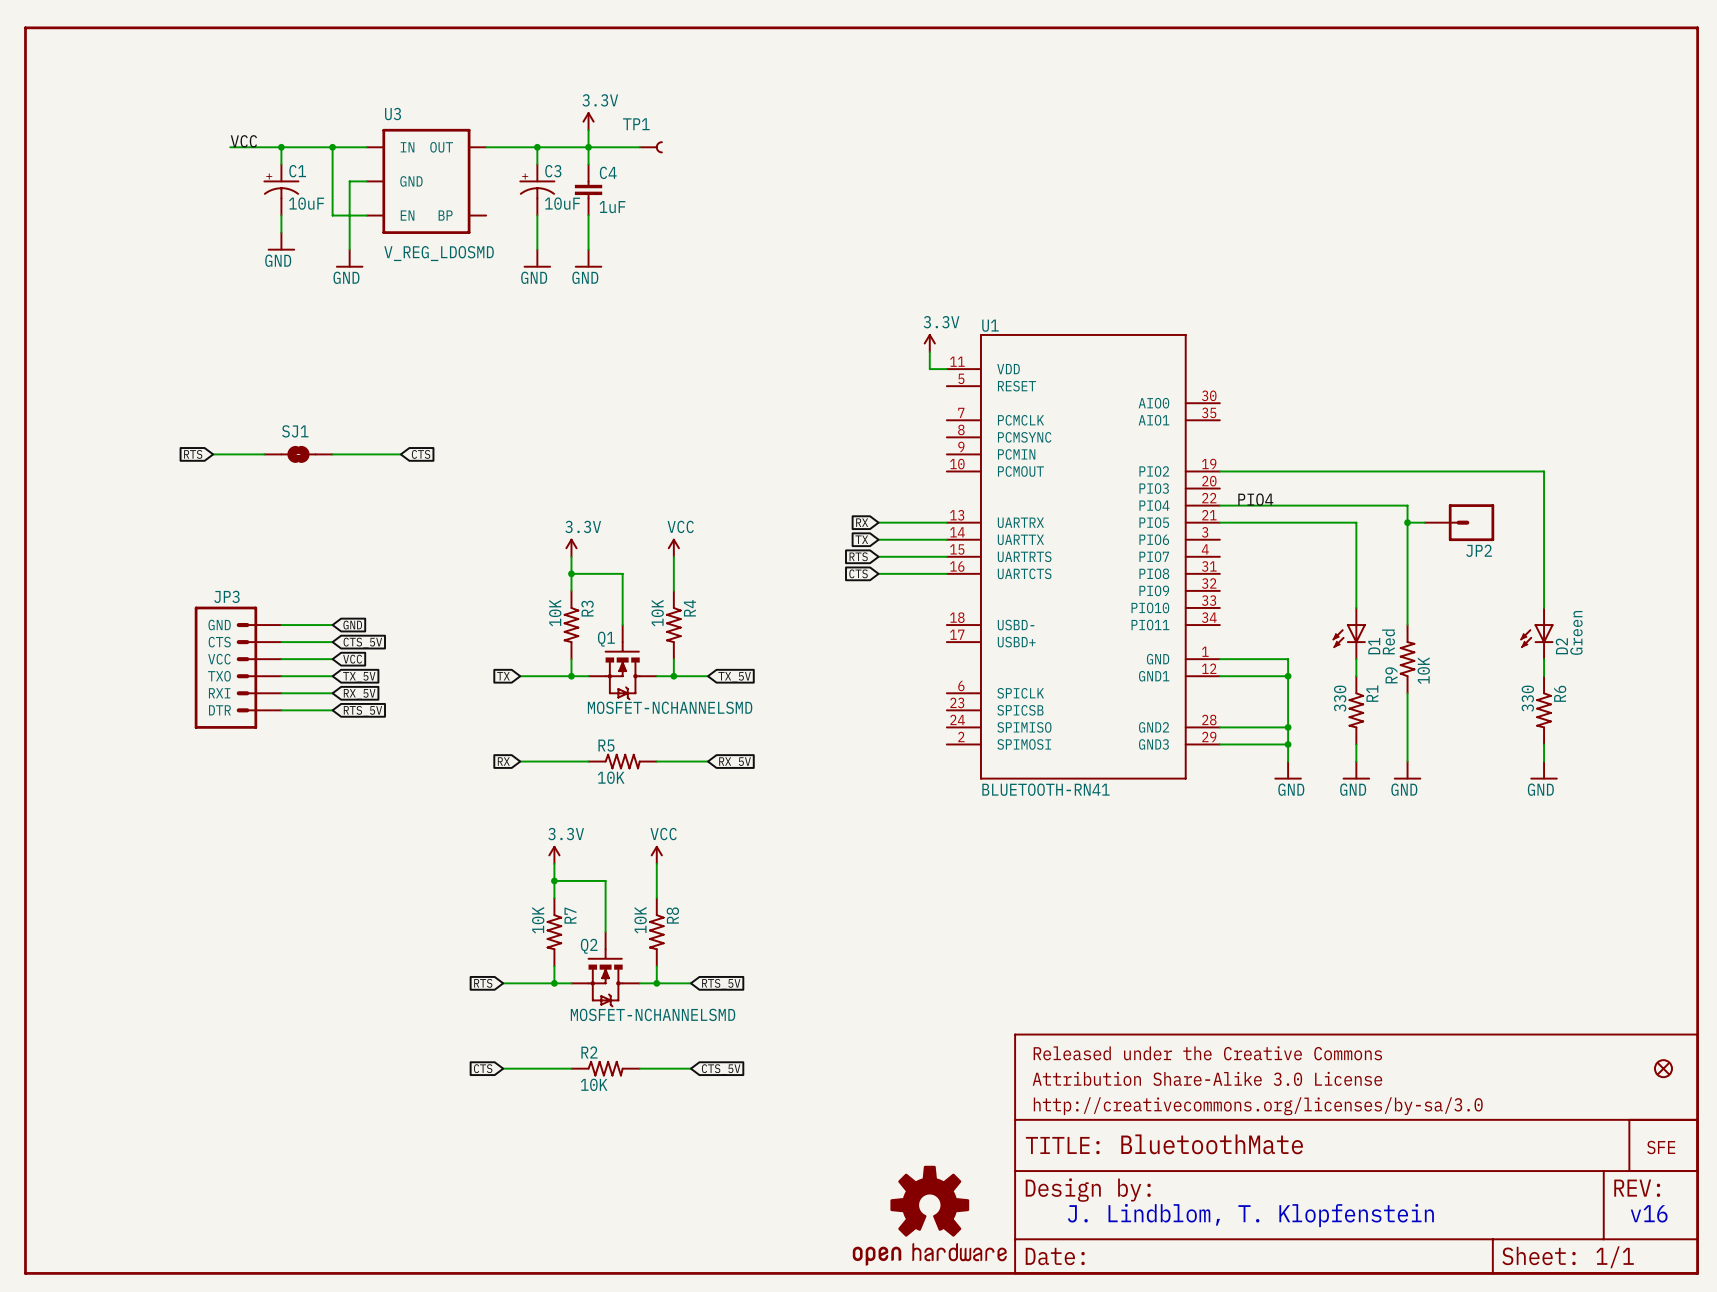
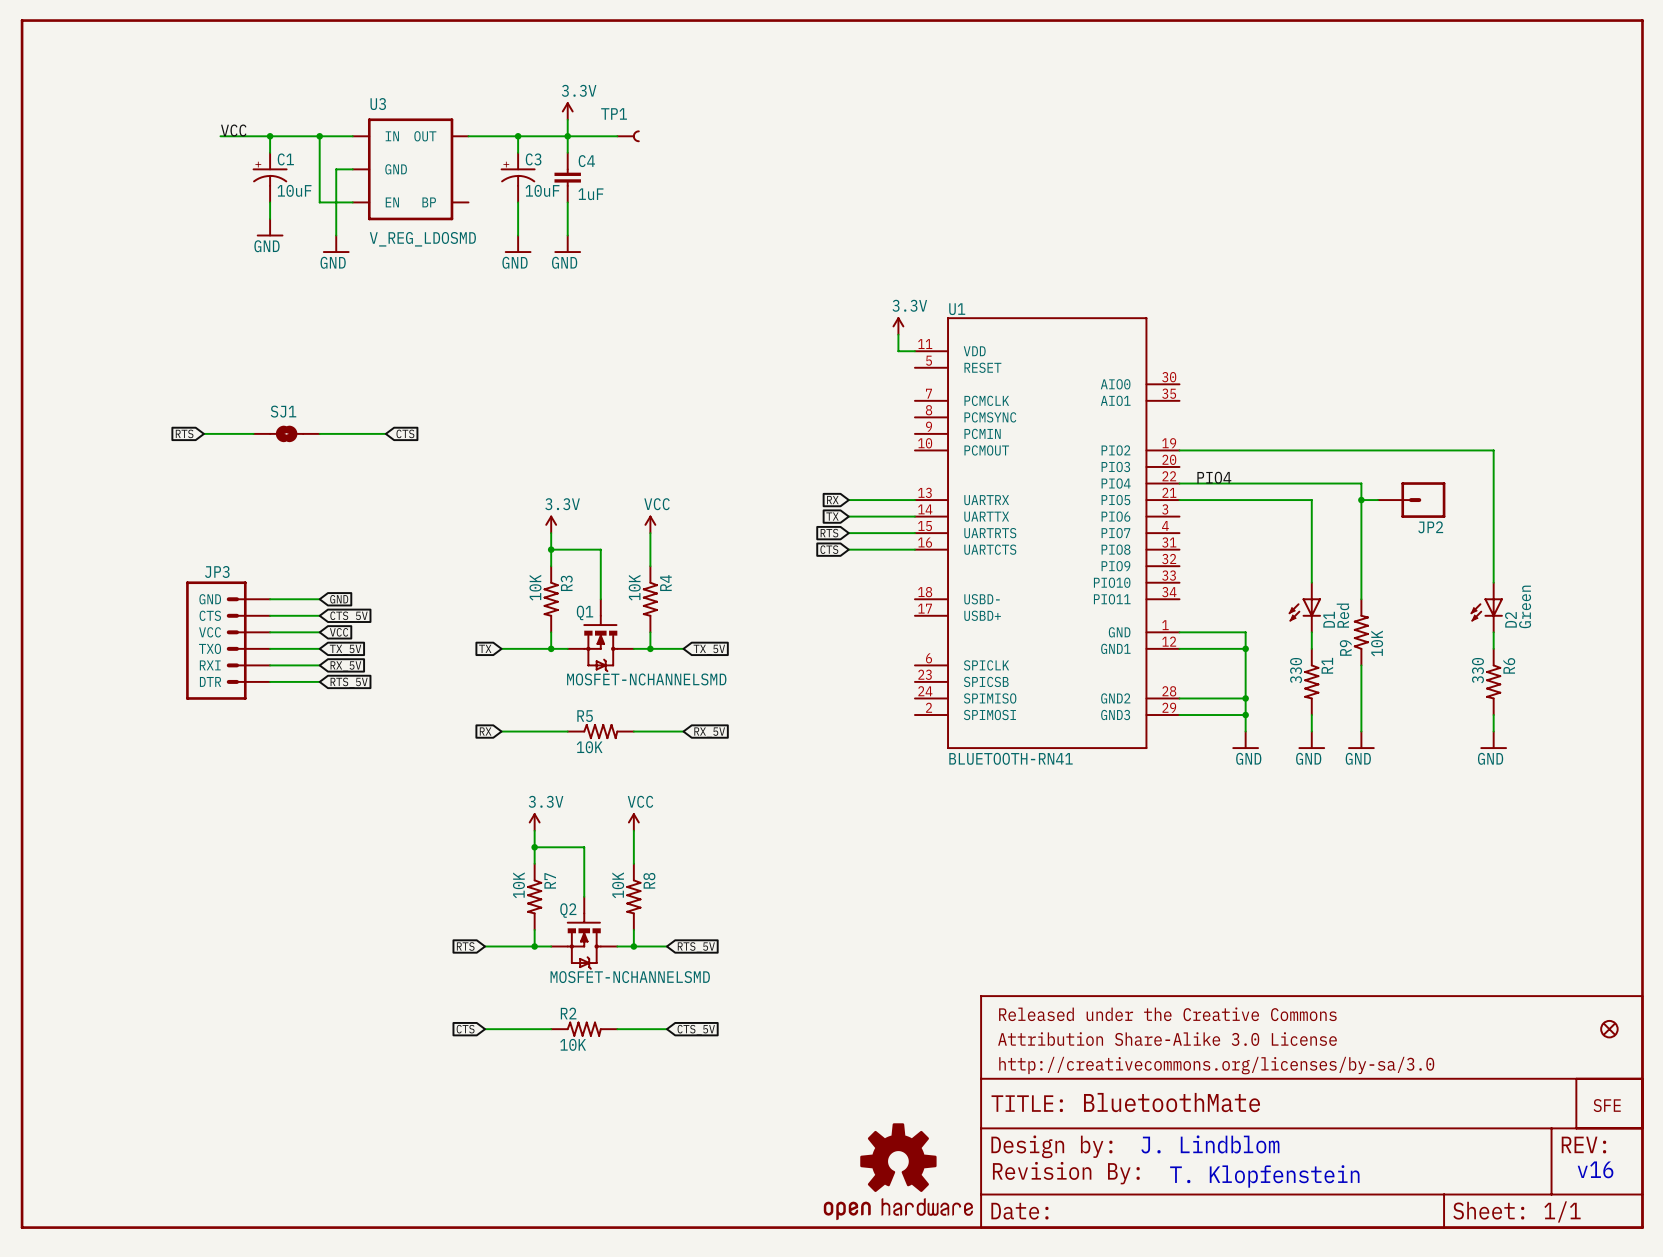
text: none -> J. Lindblom (1210, 1144)
text: J. Lindblom, T. Klopfenstein (1250, 1215) -> T. Klopfenstein (1264, 1176)
part: none -> (1066, 1173)

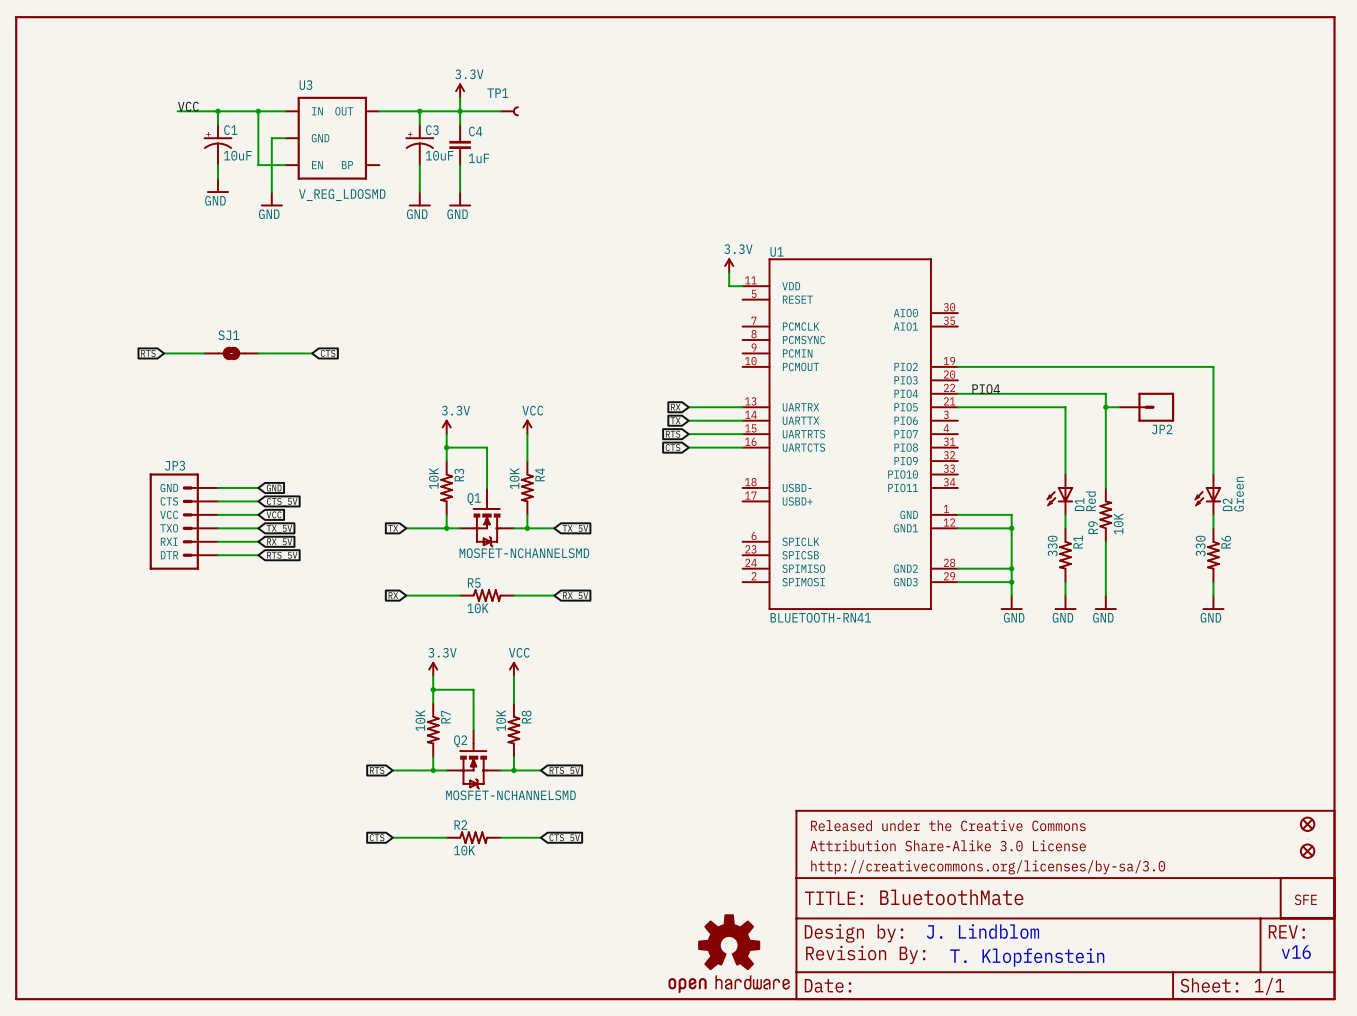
part: none -> (1307, 824)
part: (1609, 1029) -> none
part: none -> (1307, 851)

